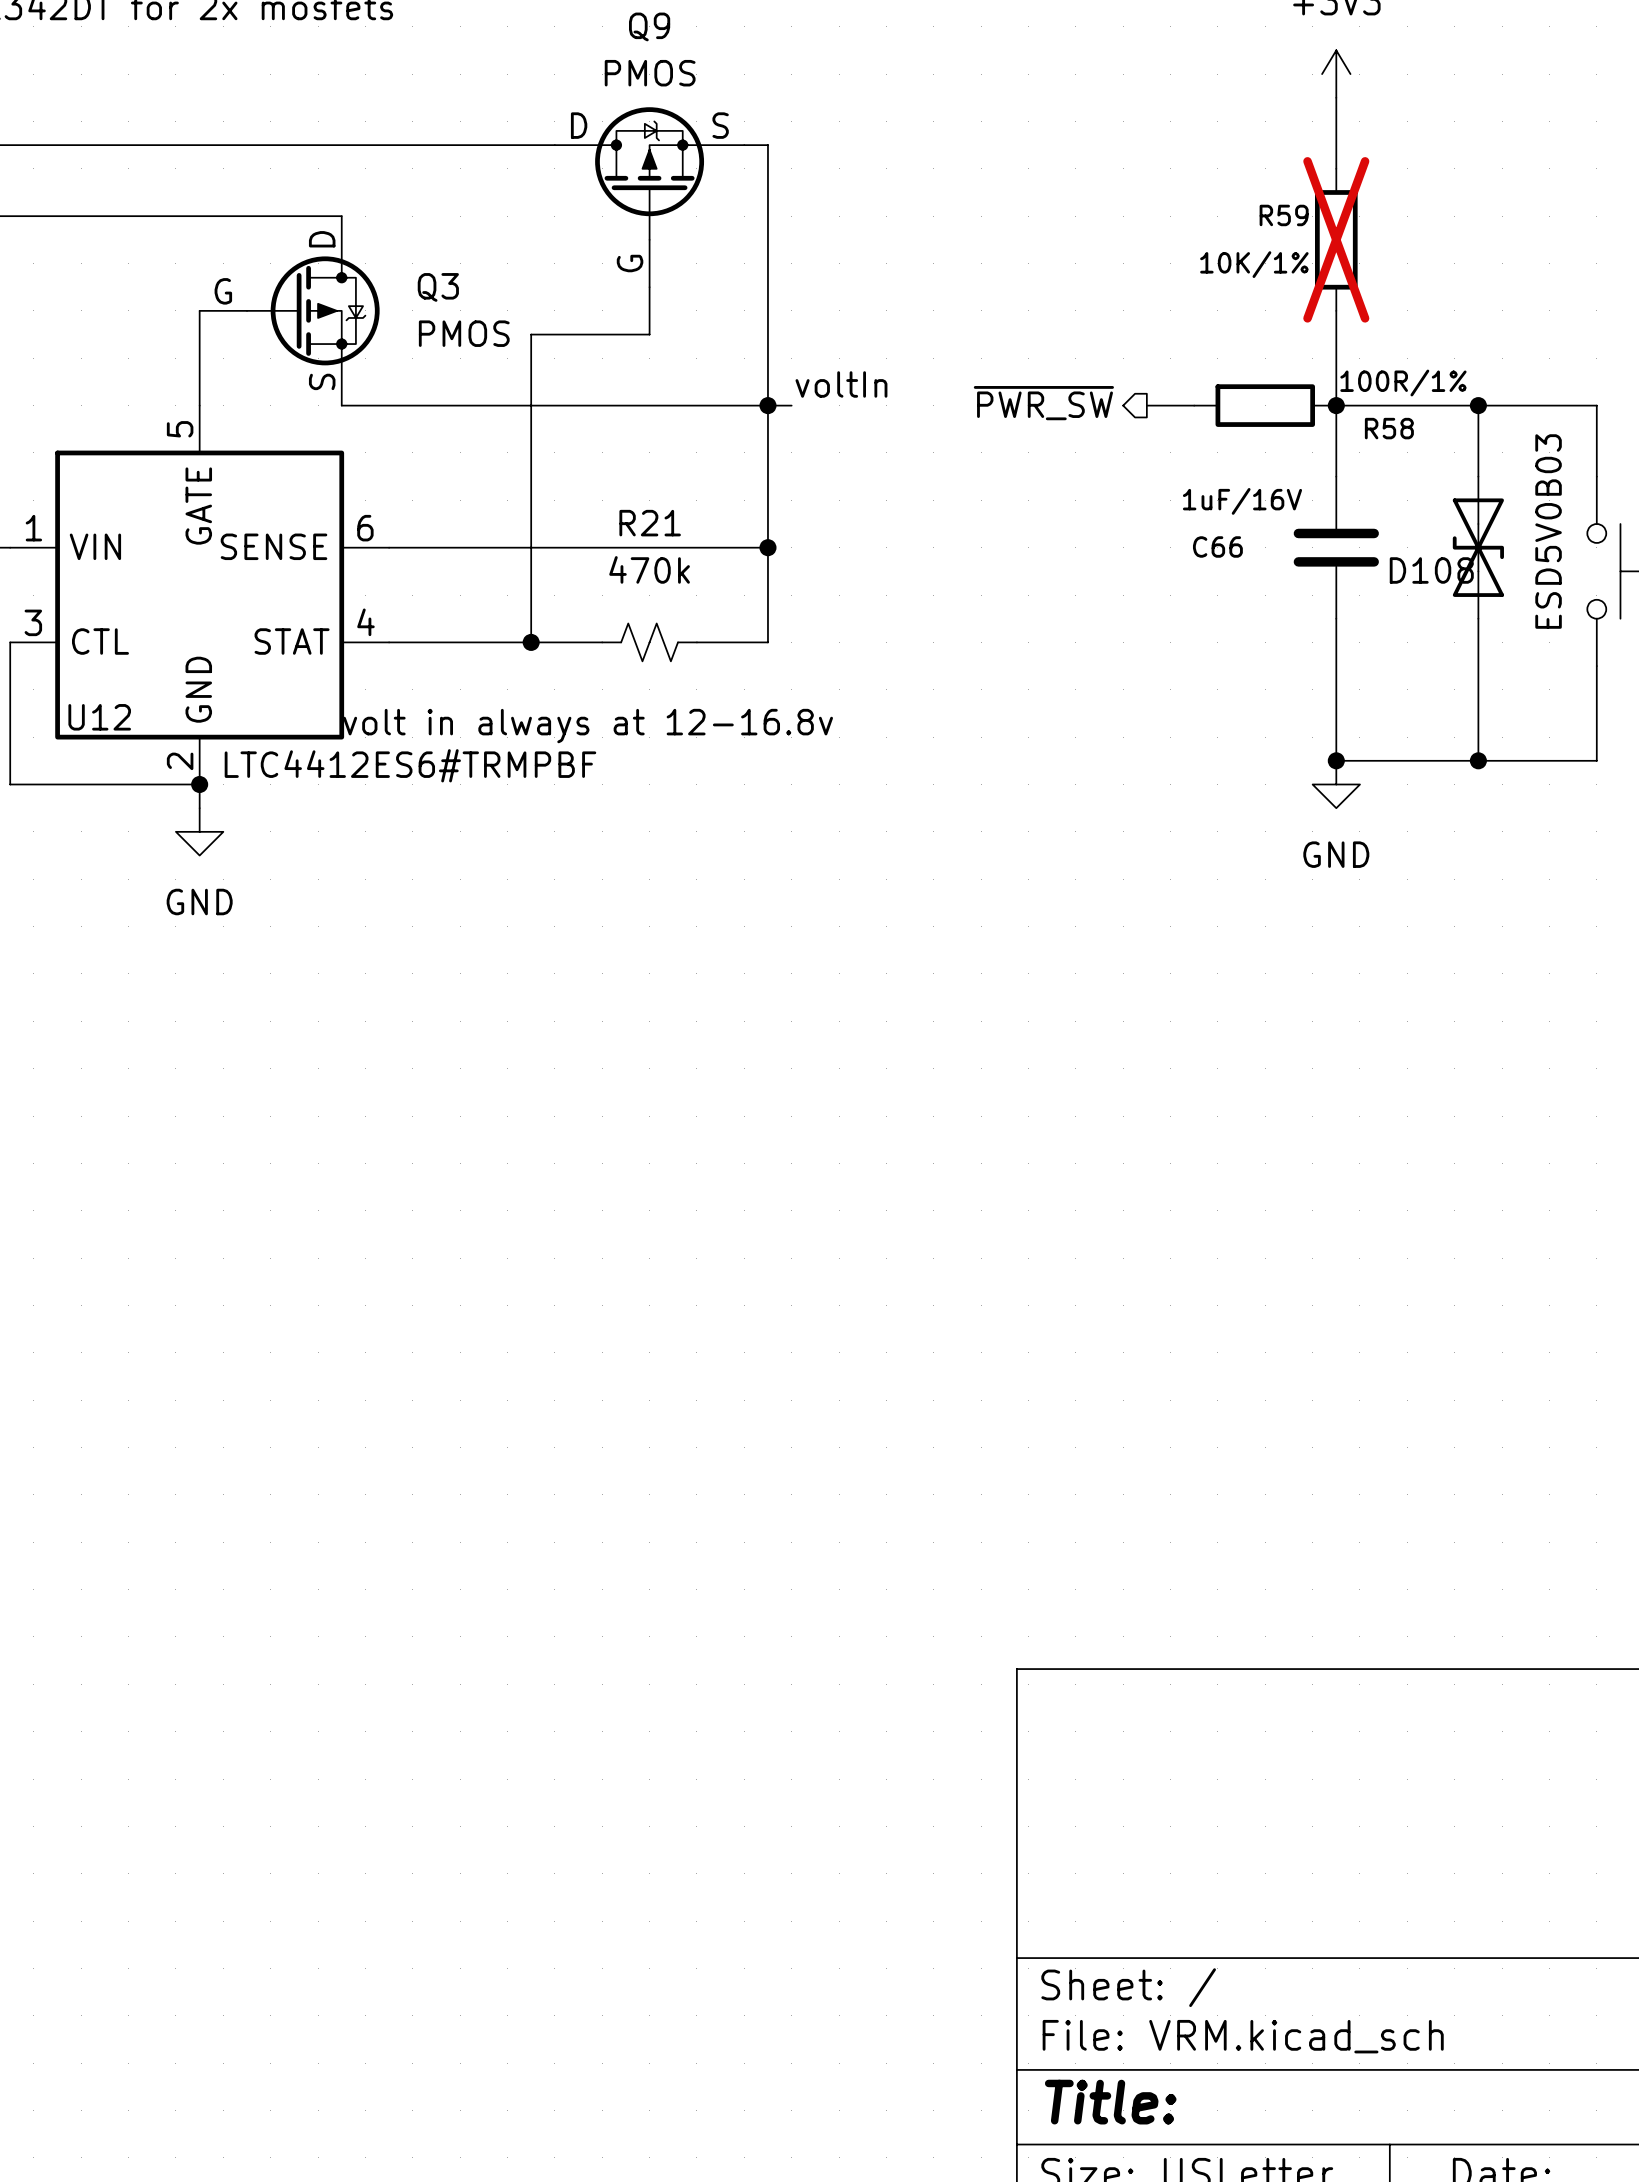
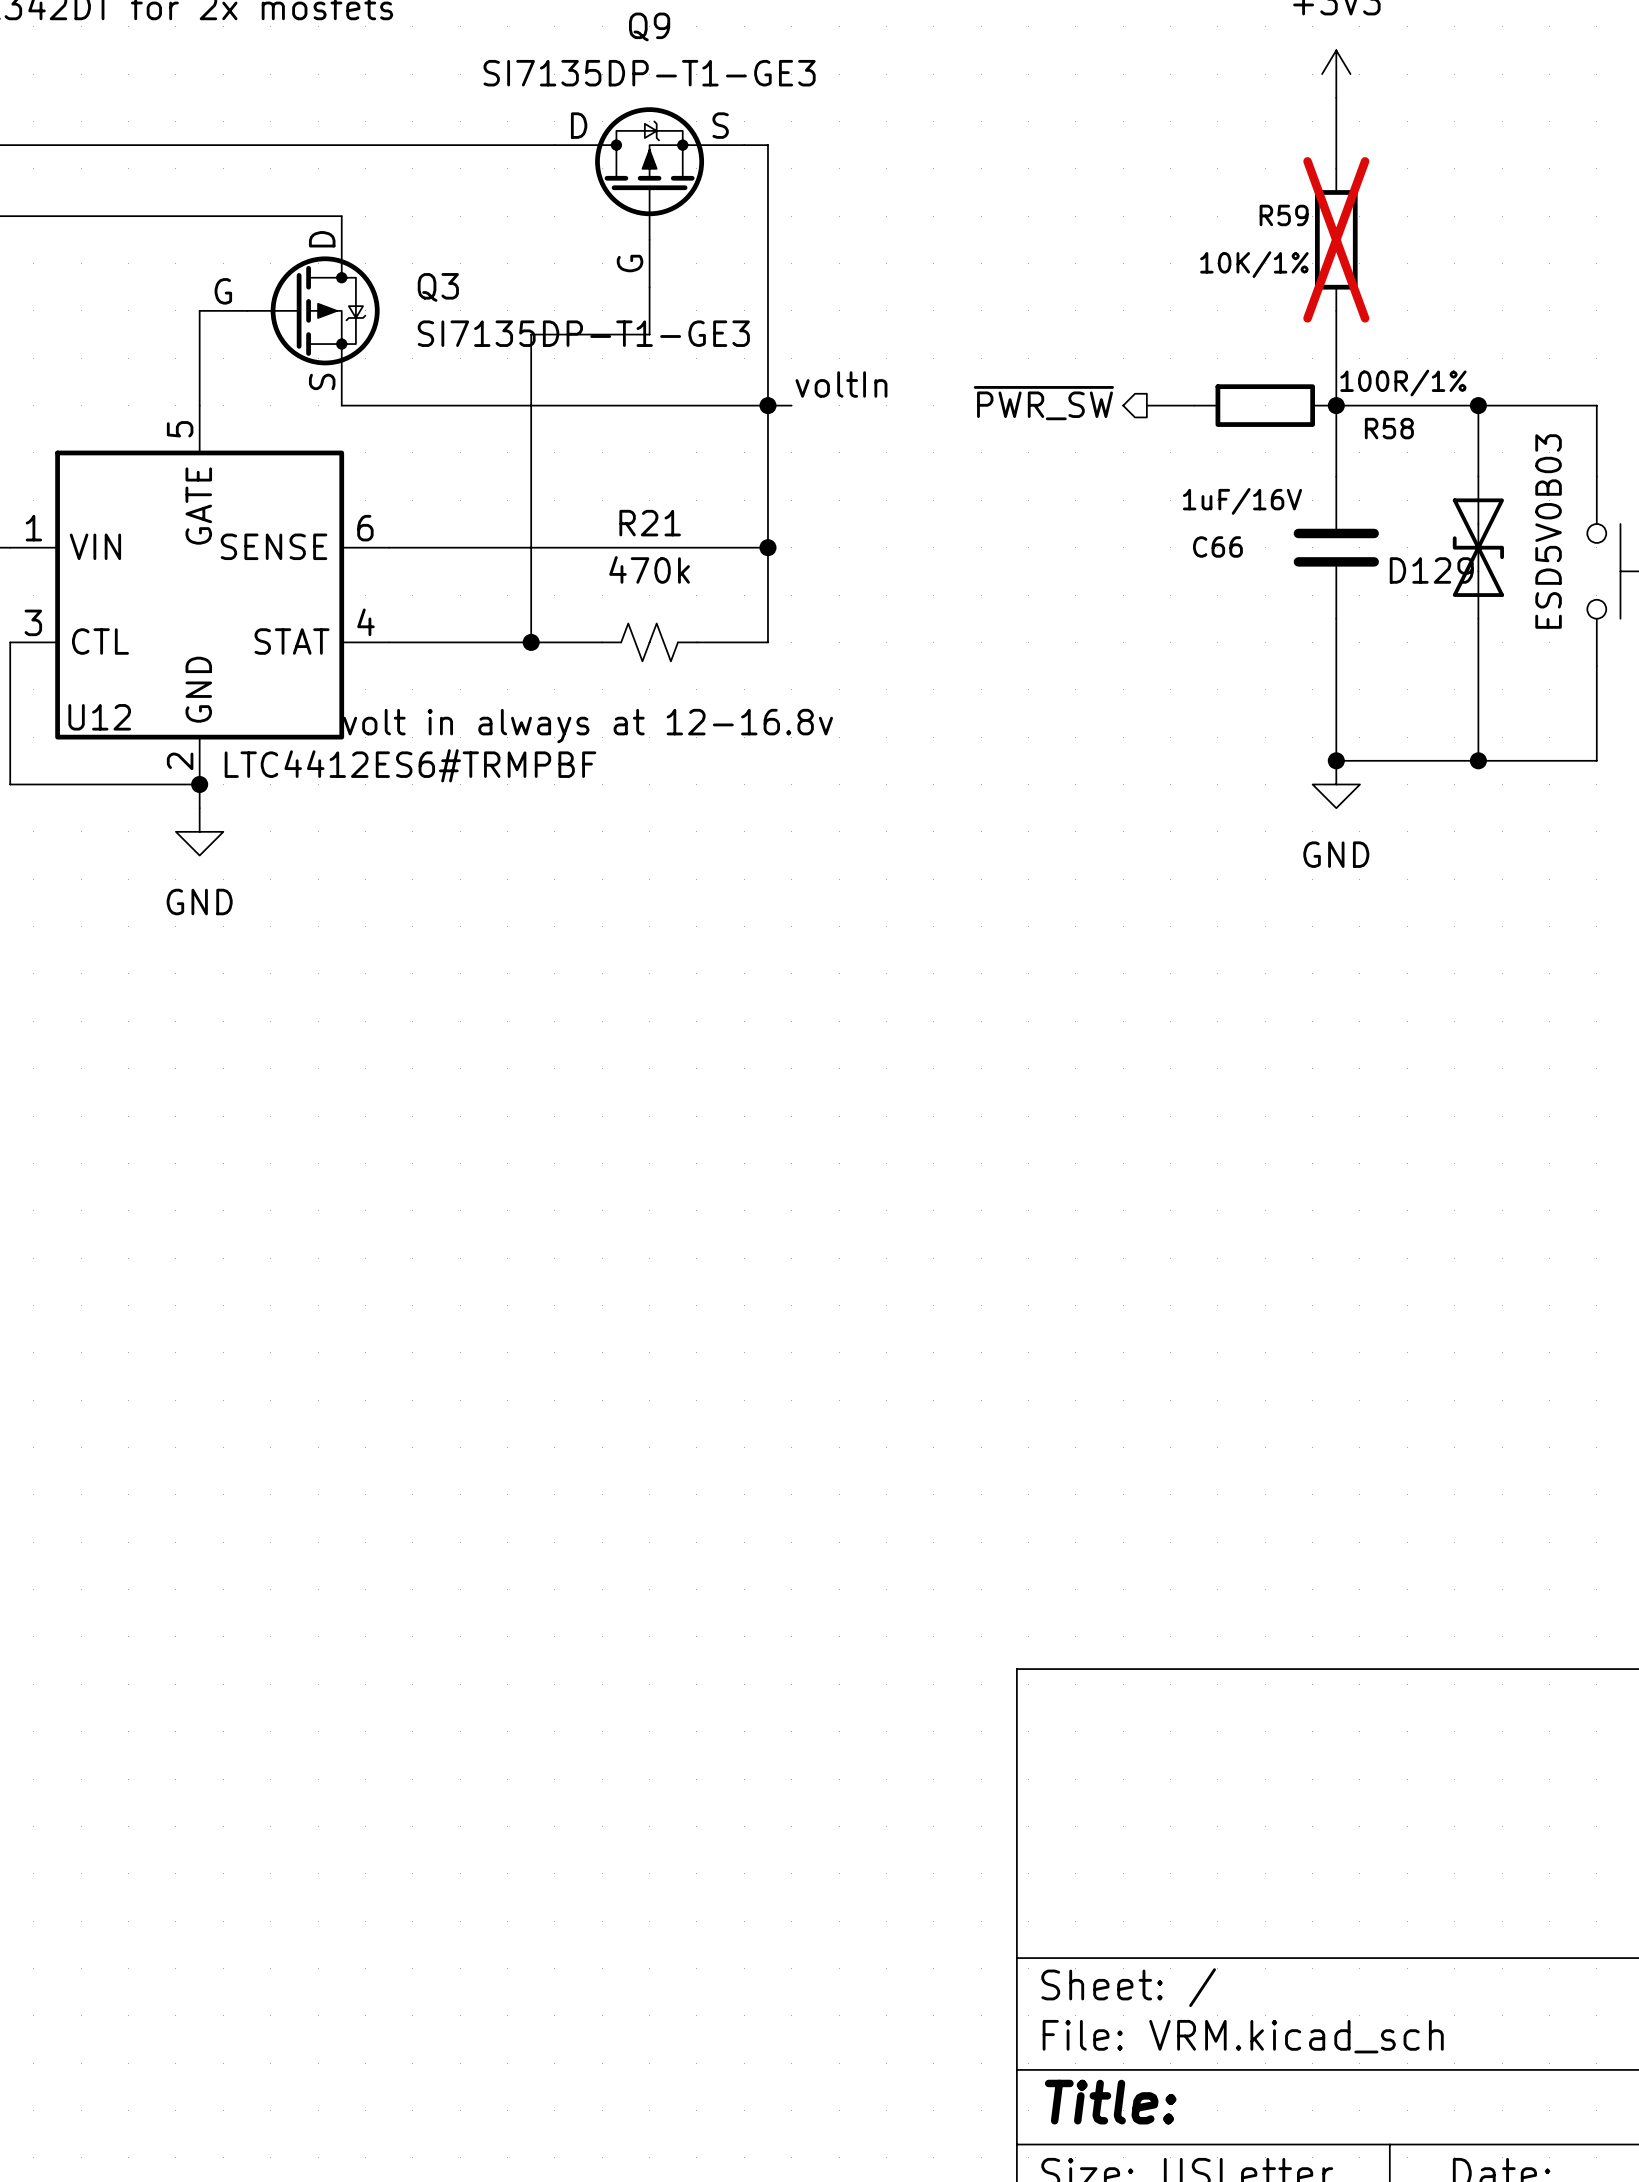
Q9 value: PMOS (650, 73) -> SI7135DP-T1-GE3 (649, 73)
Q3 value: PMOS (464, 333) -> SI7135DP-T1-GE3 (583, 333)
D108 name: D108 (1431, 570) -> D129 (1431, 570)

